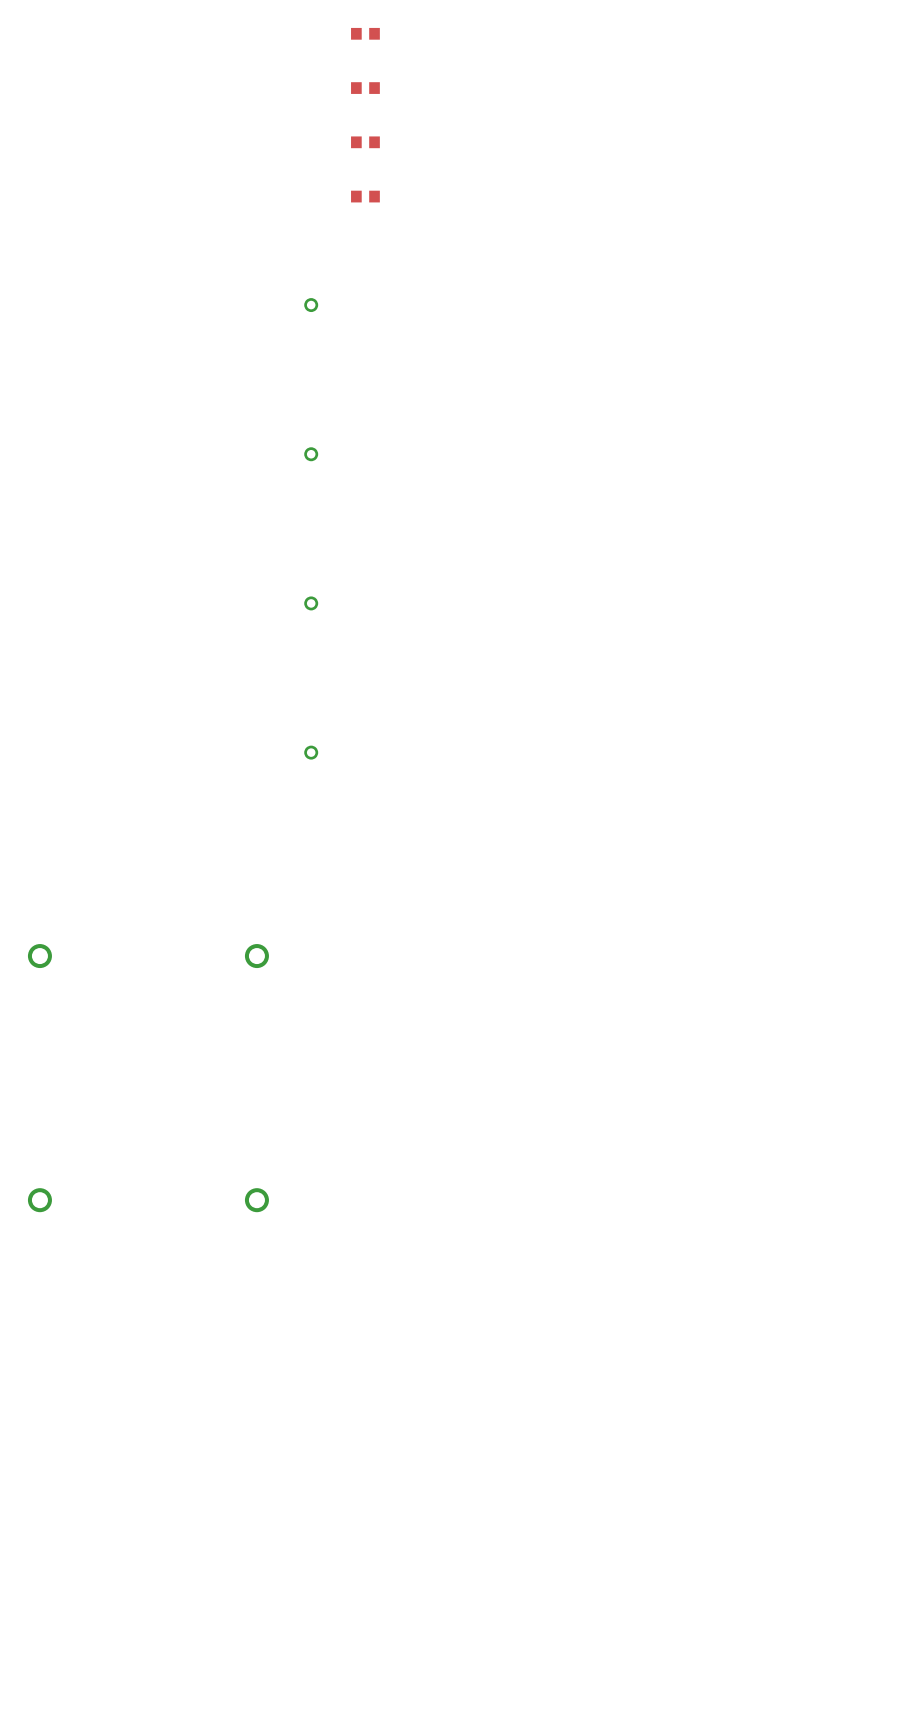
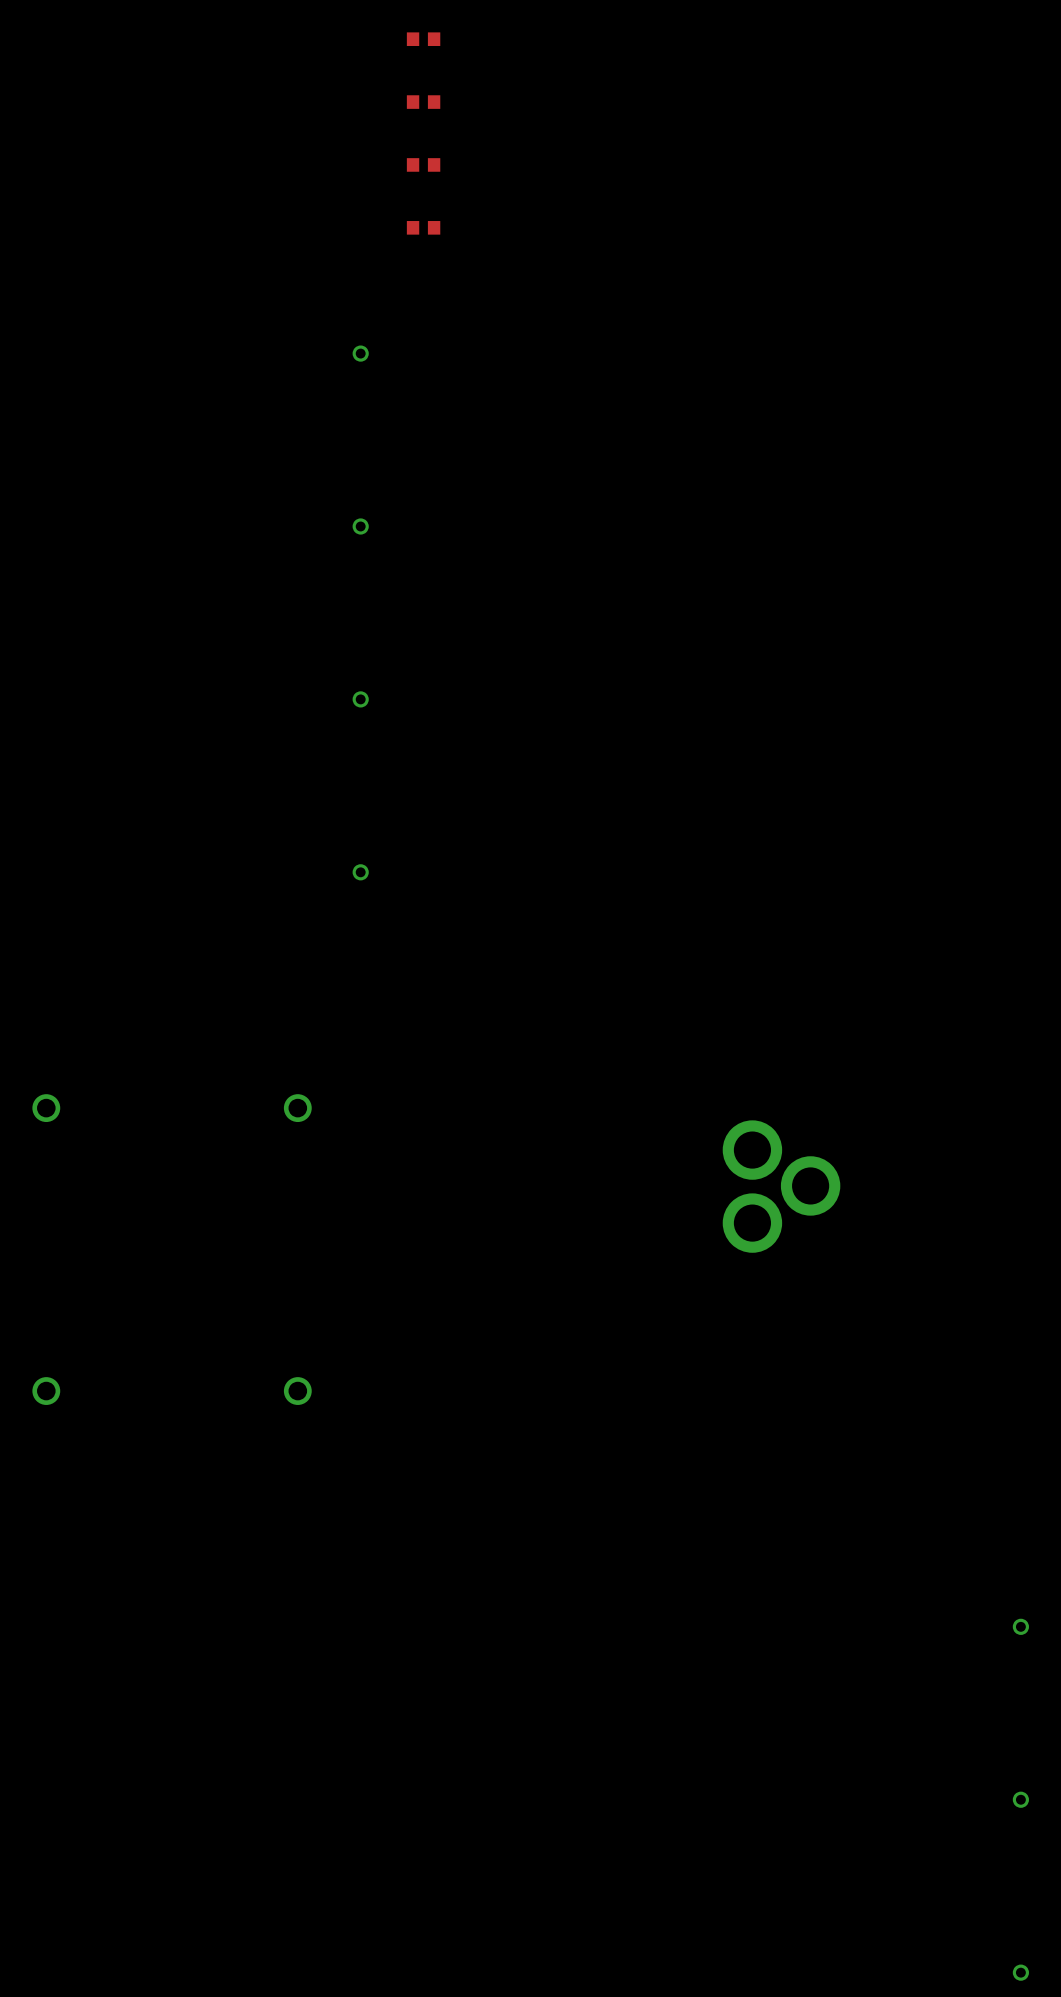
part: none -> (781, 1186)
part: none -> (1020, 1626)
part: none -> (1020, 1799)
part: none -> (1020, 1972)

